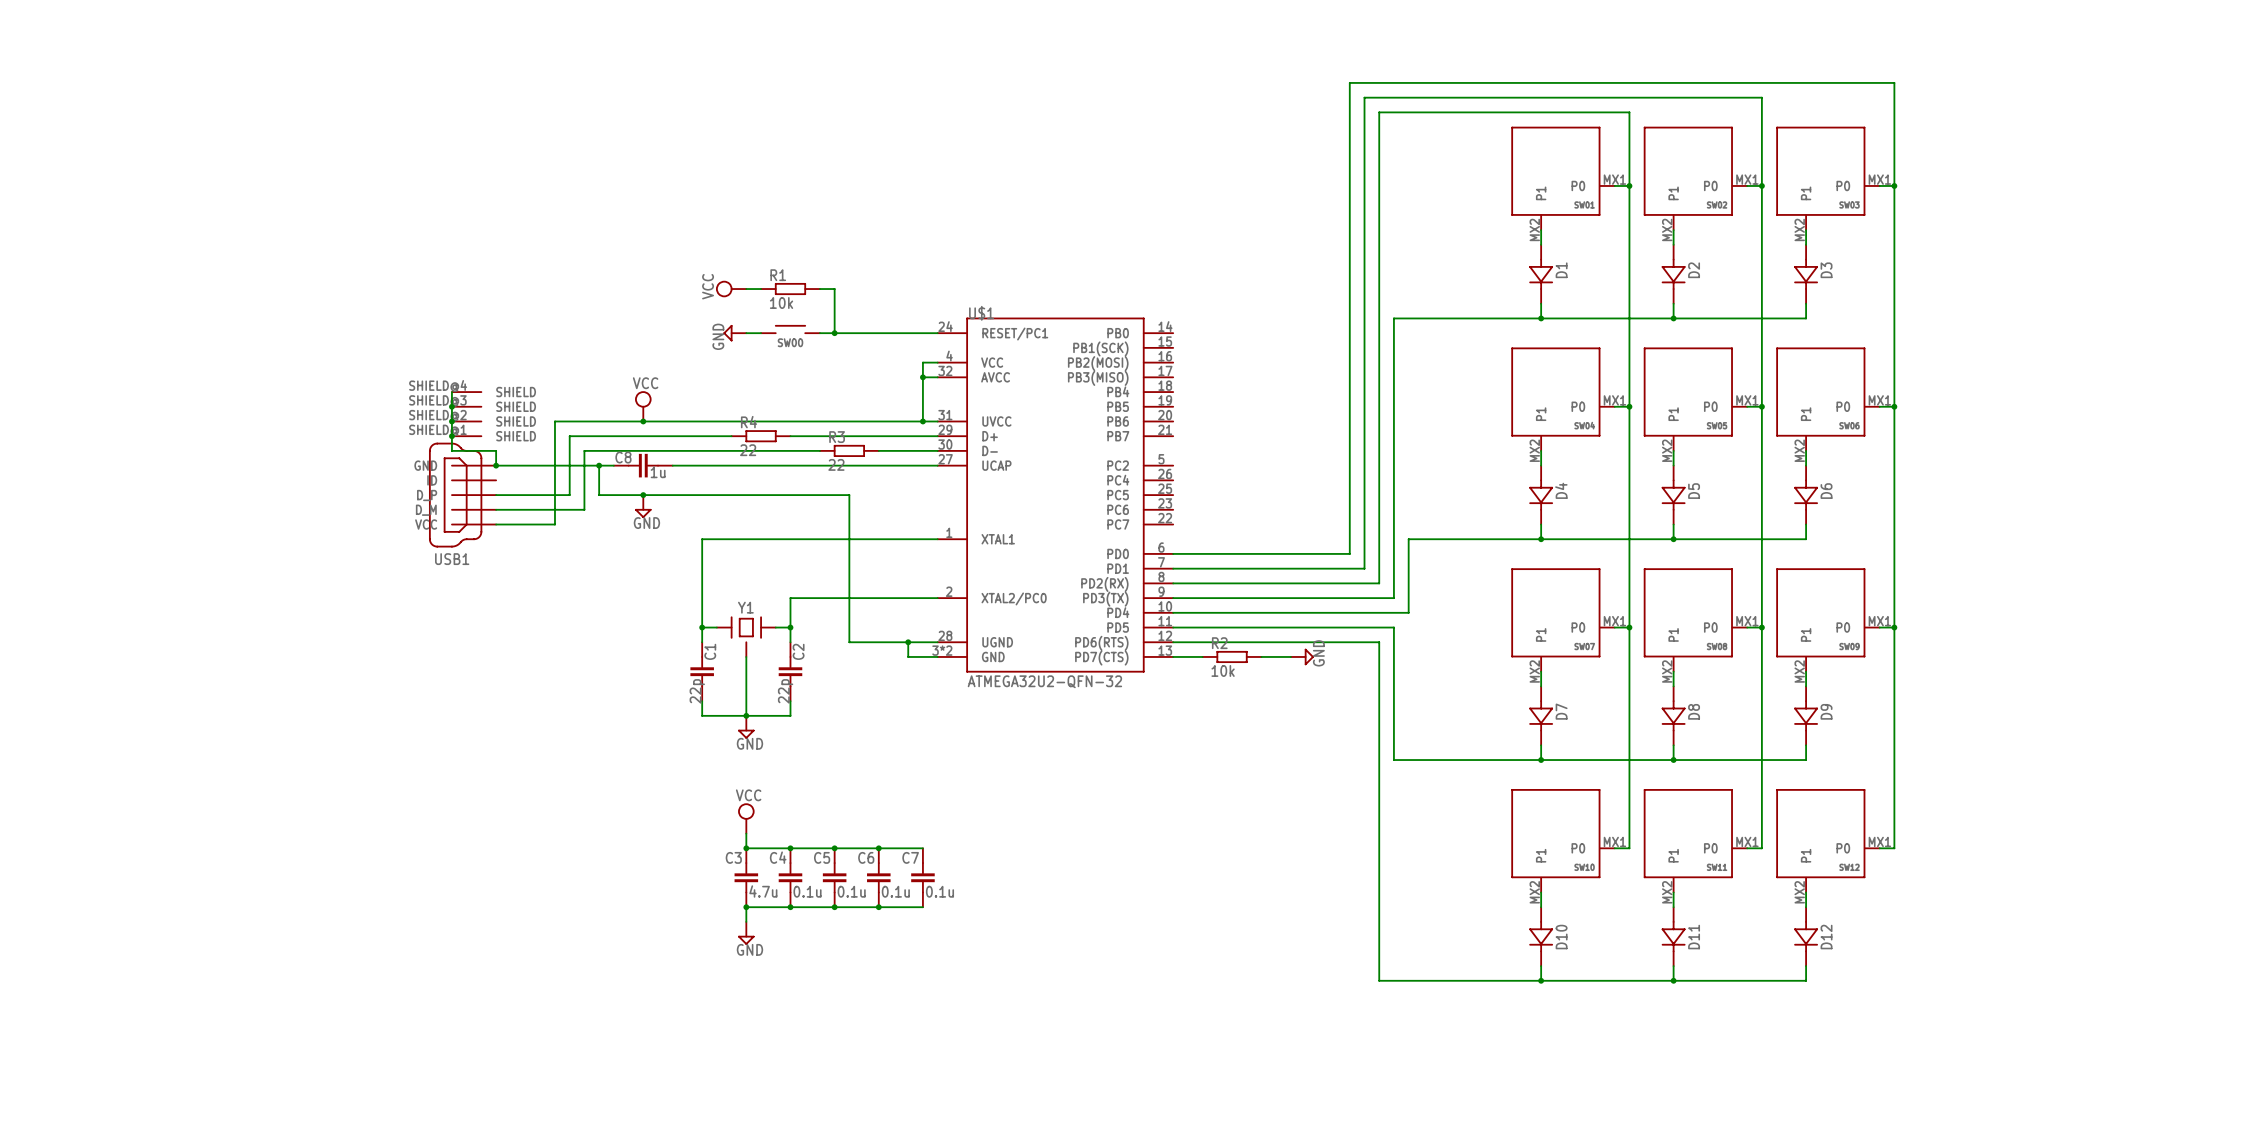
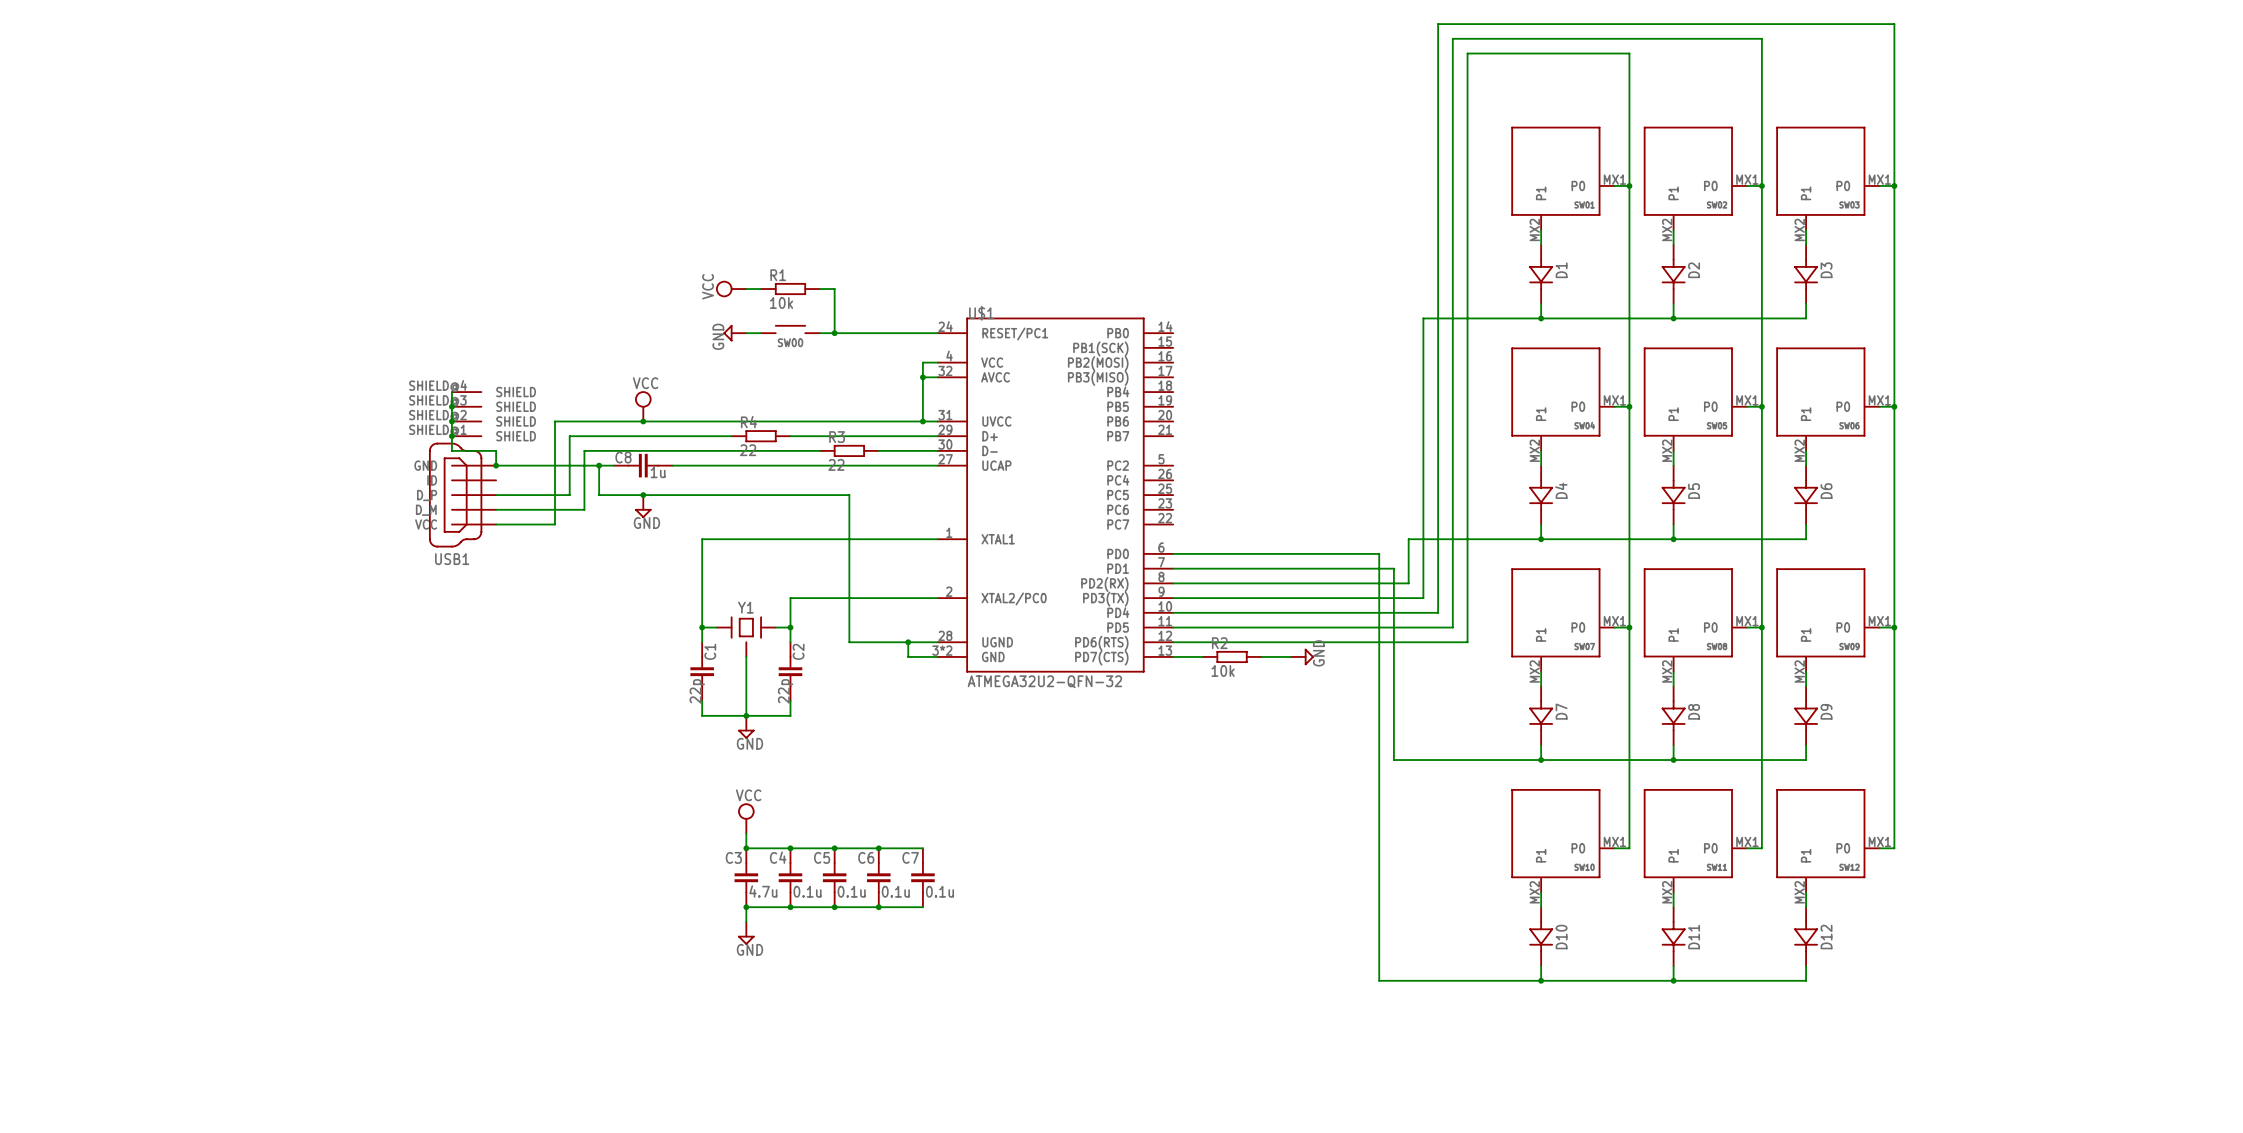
wire: (1894, 82) (1349, 82) (1349, 553) -> (1894, 82) (1894, 24) (1438, 24) (1438, 612) (1408, 612)
wire: (1761, 97) (1364, 97) (1364, 568) -> (1761, 97) (1761, 38) (1452, 38) (1452, 627) (1393, 627) (1393, 598) (1423, 598) (1423, 318)
wire: (1629, 112) (1379, 112) (1379, 553) -> (1629, 112) (1629, 53) (1467, 53) (1467, 642) (1379, 642) (1379, 583) (1408, 583)
wire: (1423, 318) (1393, 318) (1393, 568) -> (1364, 568) (1393, 568)
wire: none -> (1349, 553) (1379, 553)
wire: (1408, 583) (1408, 612) -> none

